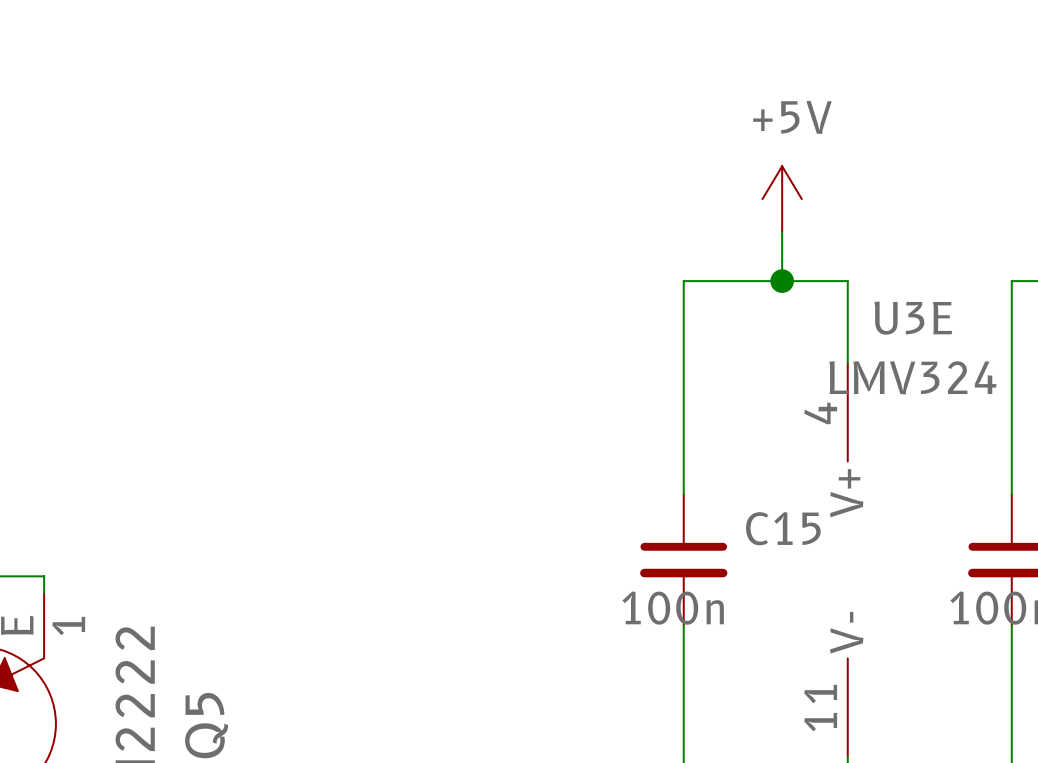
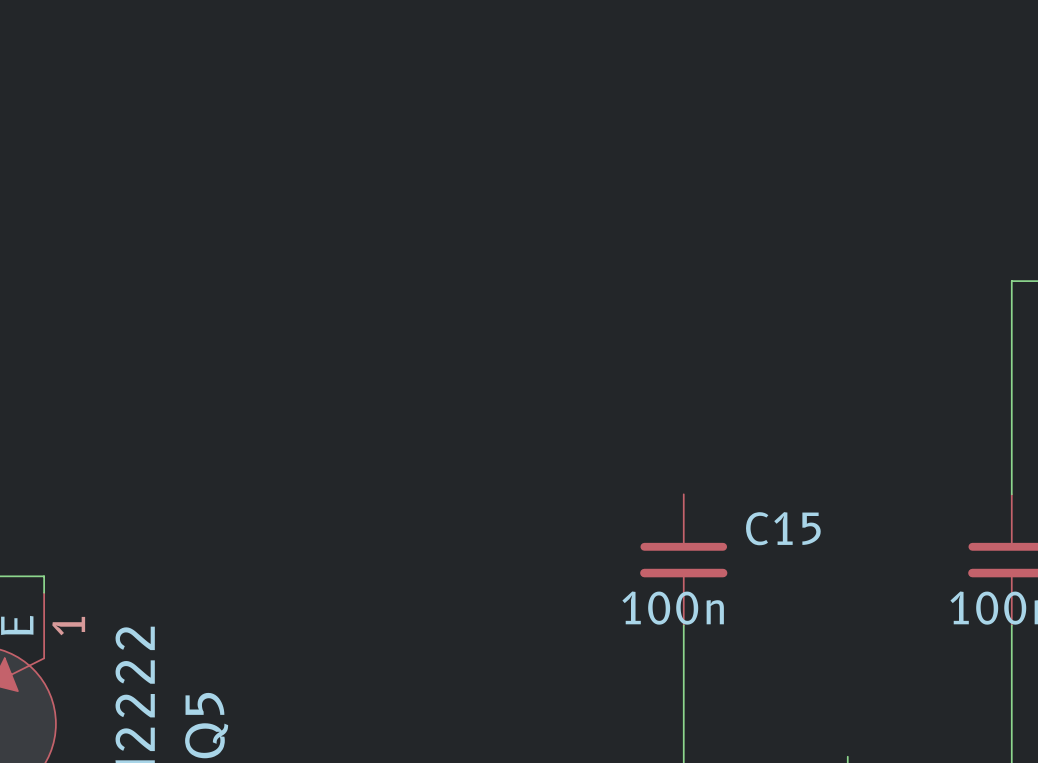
power symbol: +5V (782, 199) -> none
wire: (782, 231) (782, 281) -> none
junction: (782, 281) -> none
wire: (847, 363) (847, 281) (683, 281) (683, 494) -> none
U3E: LMV324 (847, 559) -> none

